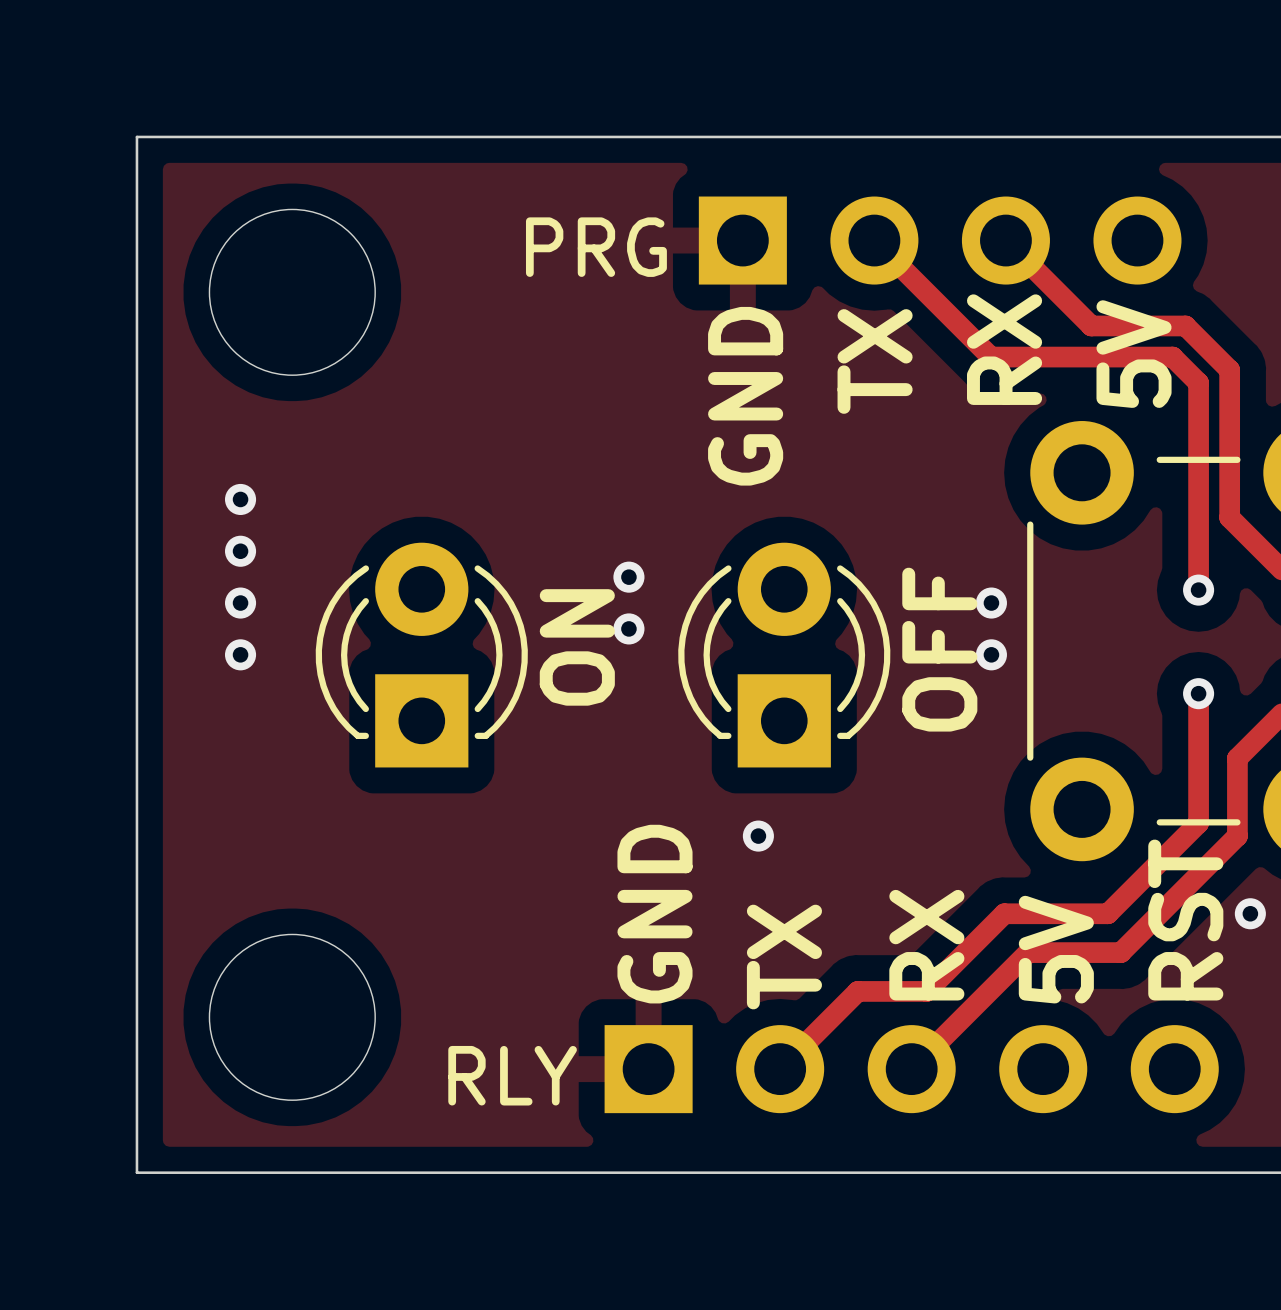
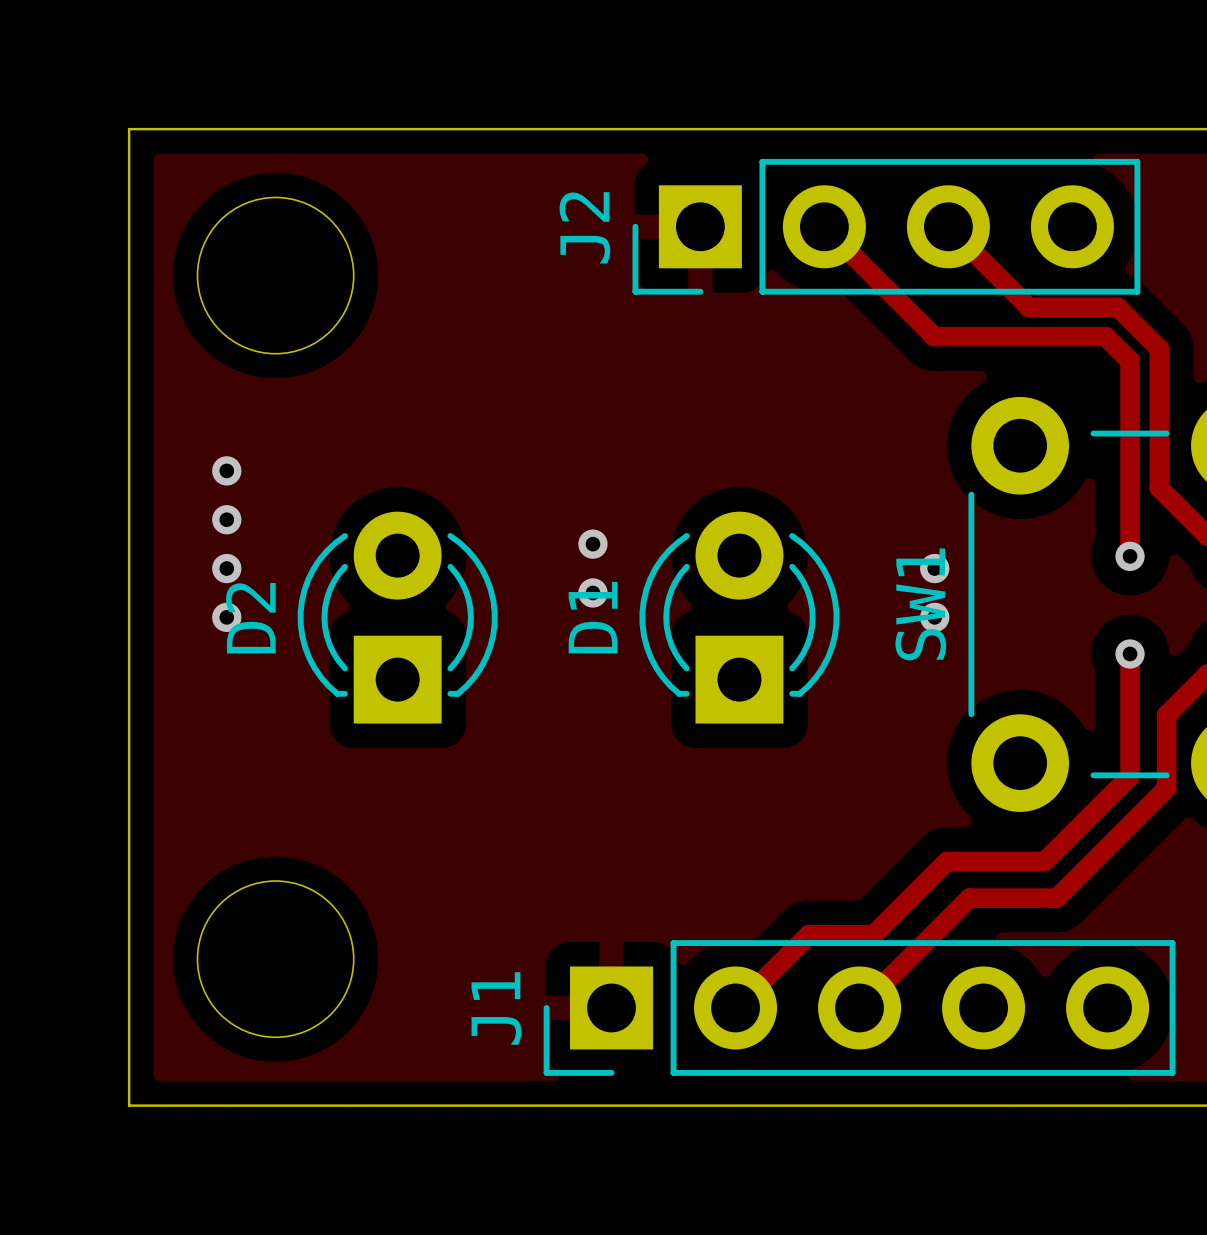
J2 side: bottom (940, 240) -> top (886, 226)
text: PRG (596, 247) -> none
text: RX (1004, 349) -> none
text: 5V (1134, 354) -> none
text: TX (875, 361) -> none
text: GND (745, 396) -> none
SW1 name: none -> SW1 (920, 604)
text: ON (577, 647) -> none
text: OFF (939, 649) -> none
D2 name: none -> D2 (250, 618)
D1 name: none -> D1 (593, 617)
via: (758, 836) -> none
via: (1250, 913) -> none
text: GND (654, 914) -> none
text: RST (1185, 920) -> none
text: RX (926, 945) -> none
text: 5V (1056, 949) -> none
text: TX (784, 957) -> none
J1 side: bottom (911, 1069) -> top (859, 1007)
text: RLY (512, 1075) -> none

